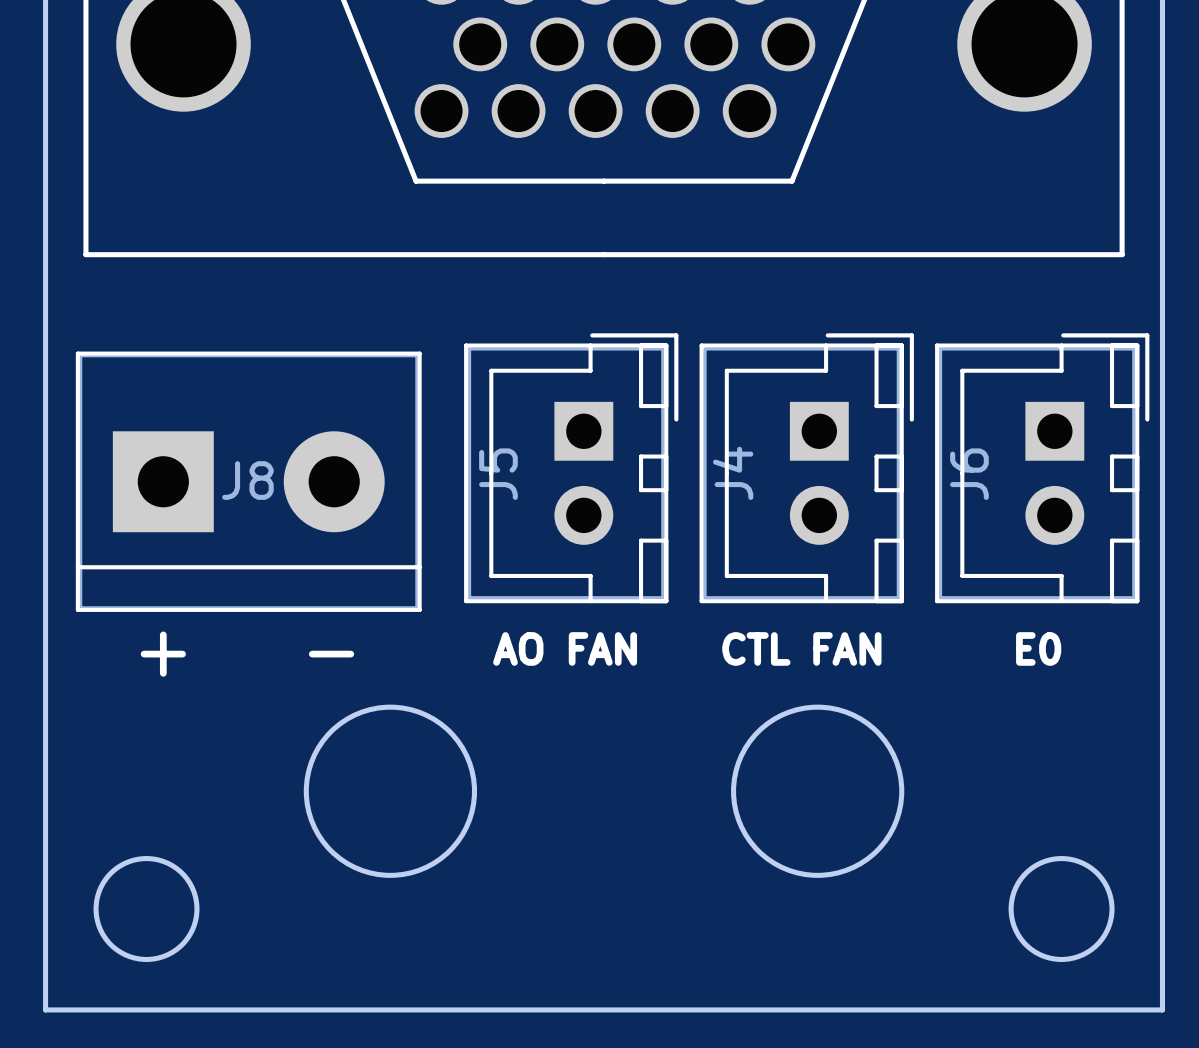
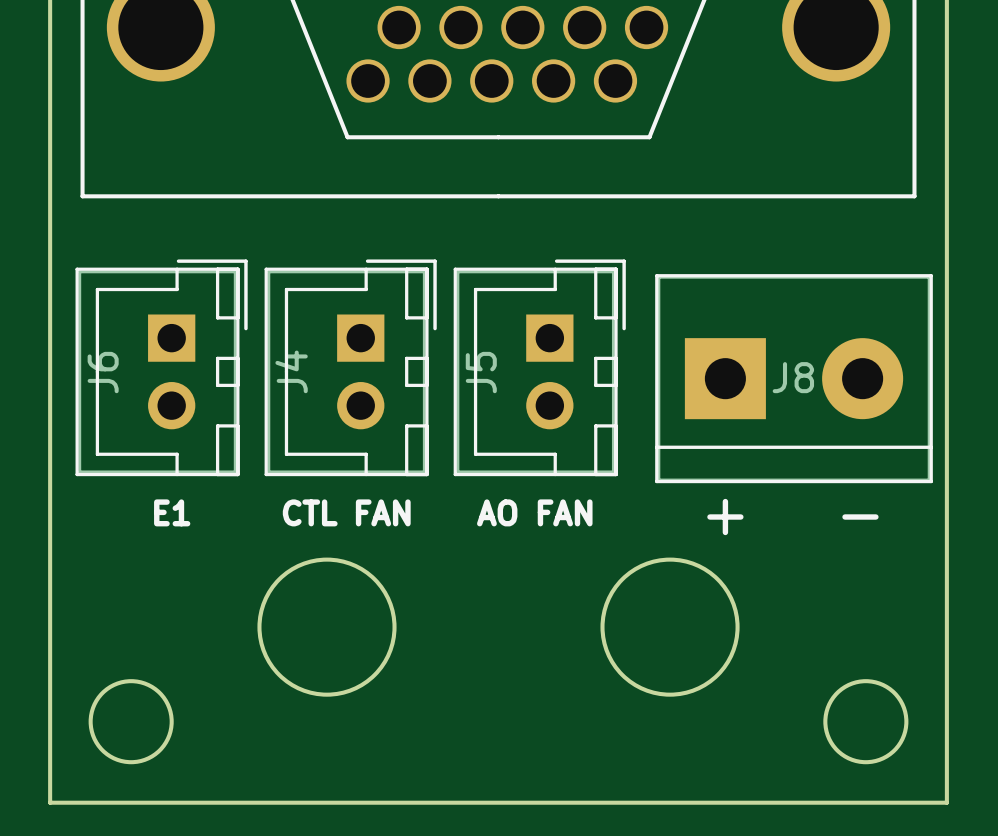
J5 position: (571, 468) -> (539, 367)
J4 position: (806, 468) -> (350, 367)
J6 position: (1042, 468) -> (161, 367)
J8 position: (248, 481) -> (794, 378)
text: none -> E1 (172, 512)
text position: AO FAN (565, 648) -> AO FAN (534, 512)
text position: CTL FAN (801, 648) -> CTL FAN (346, 512)
text: E0 (1038, 648) -> none
text position: + (163, 654) -> + (725, 517)
text position: - (331, 654) -> - (860, 517)

